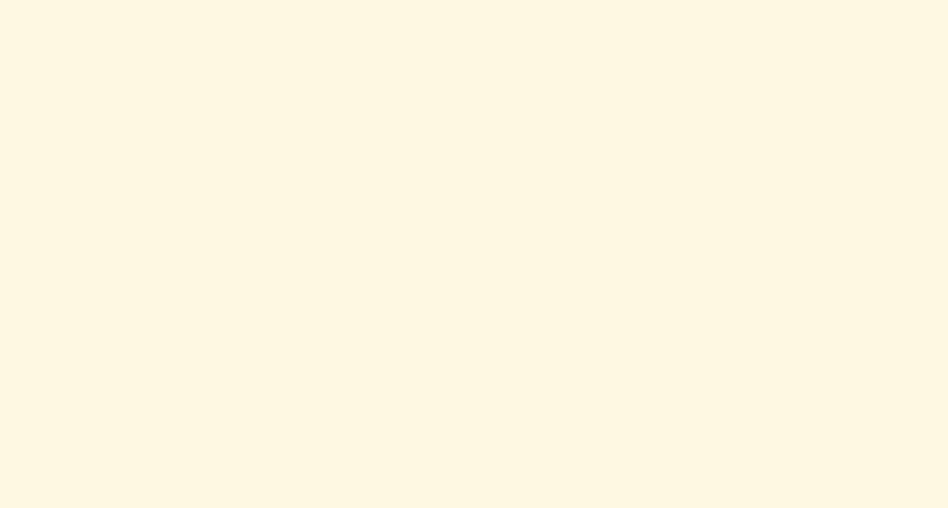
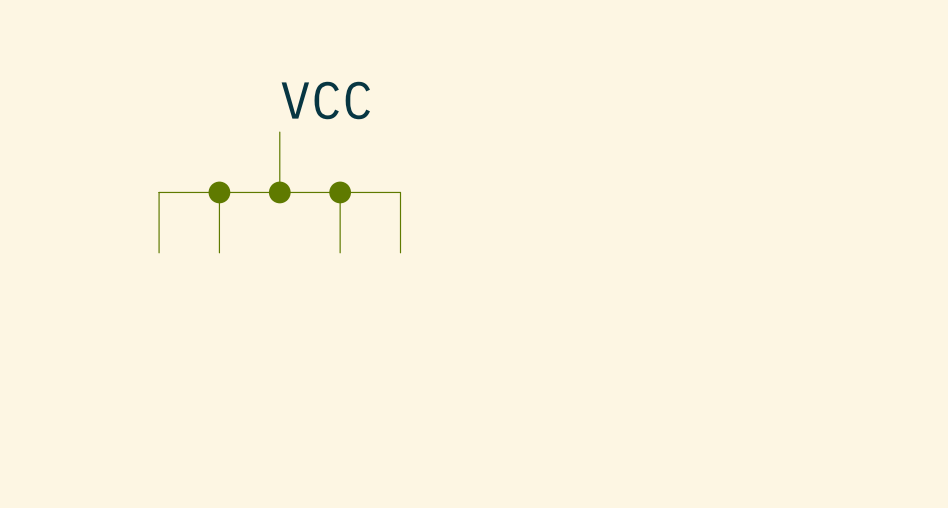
label: none -> VCC (325, 100)
wire: none -> (279, 132) (279, 192)
wire: none -> (219, 192) (219, 252)
junction: none -> (219, 192)
junction: none -> (279, 192)
wire: none -> (340, 192) (340, 252)
junction: none -> (340, 192)
wire: none -> (159, 252) (159, 192) (400, 192) (400, 252)

